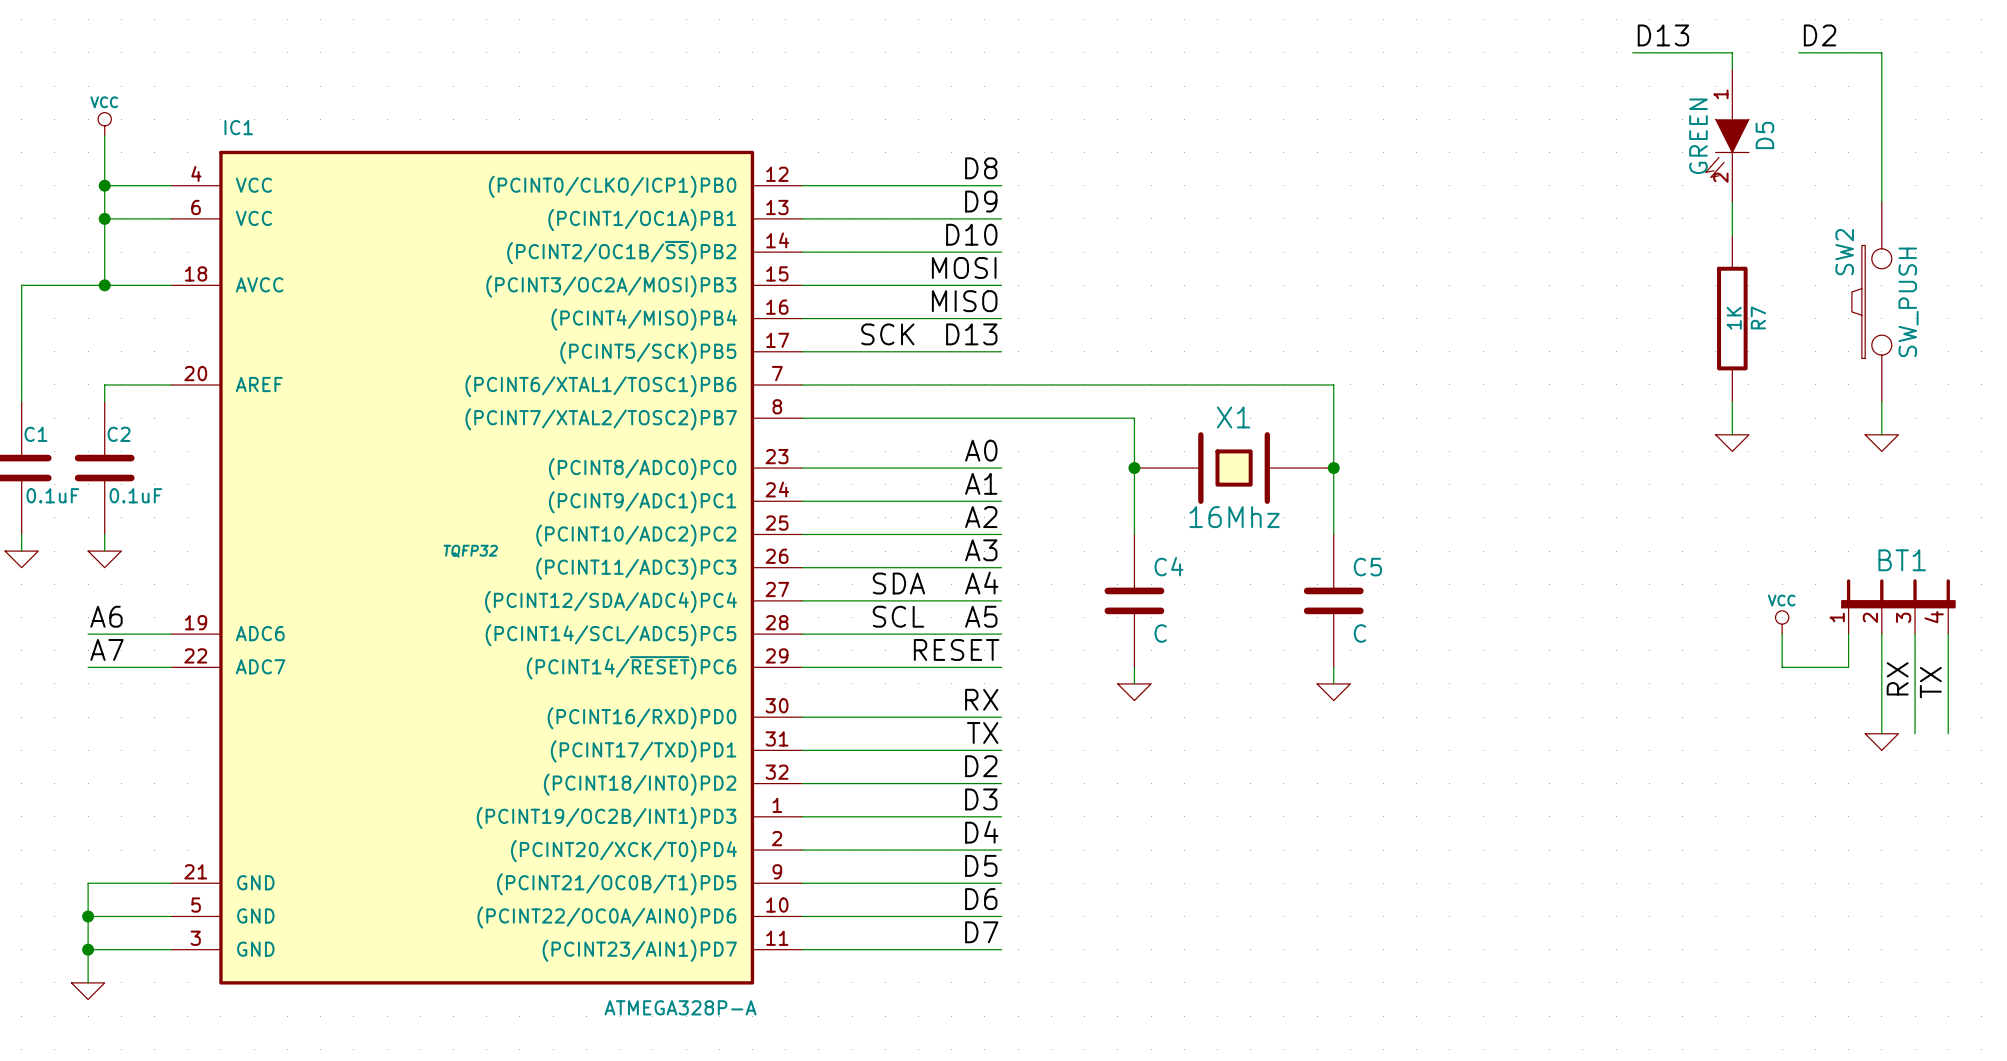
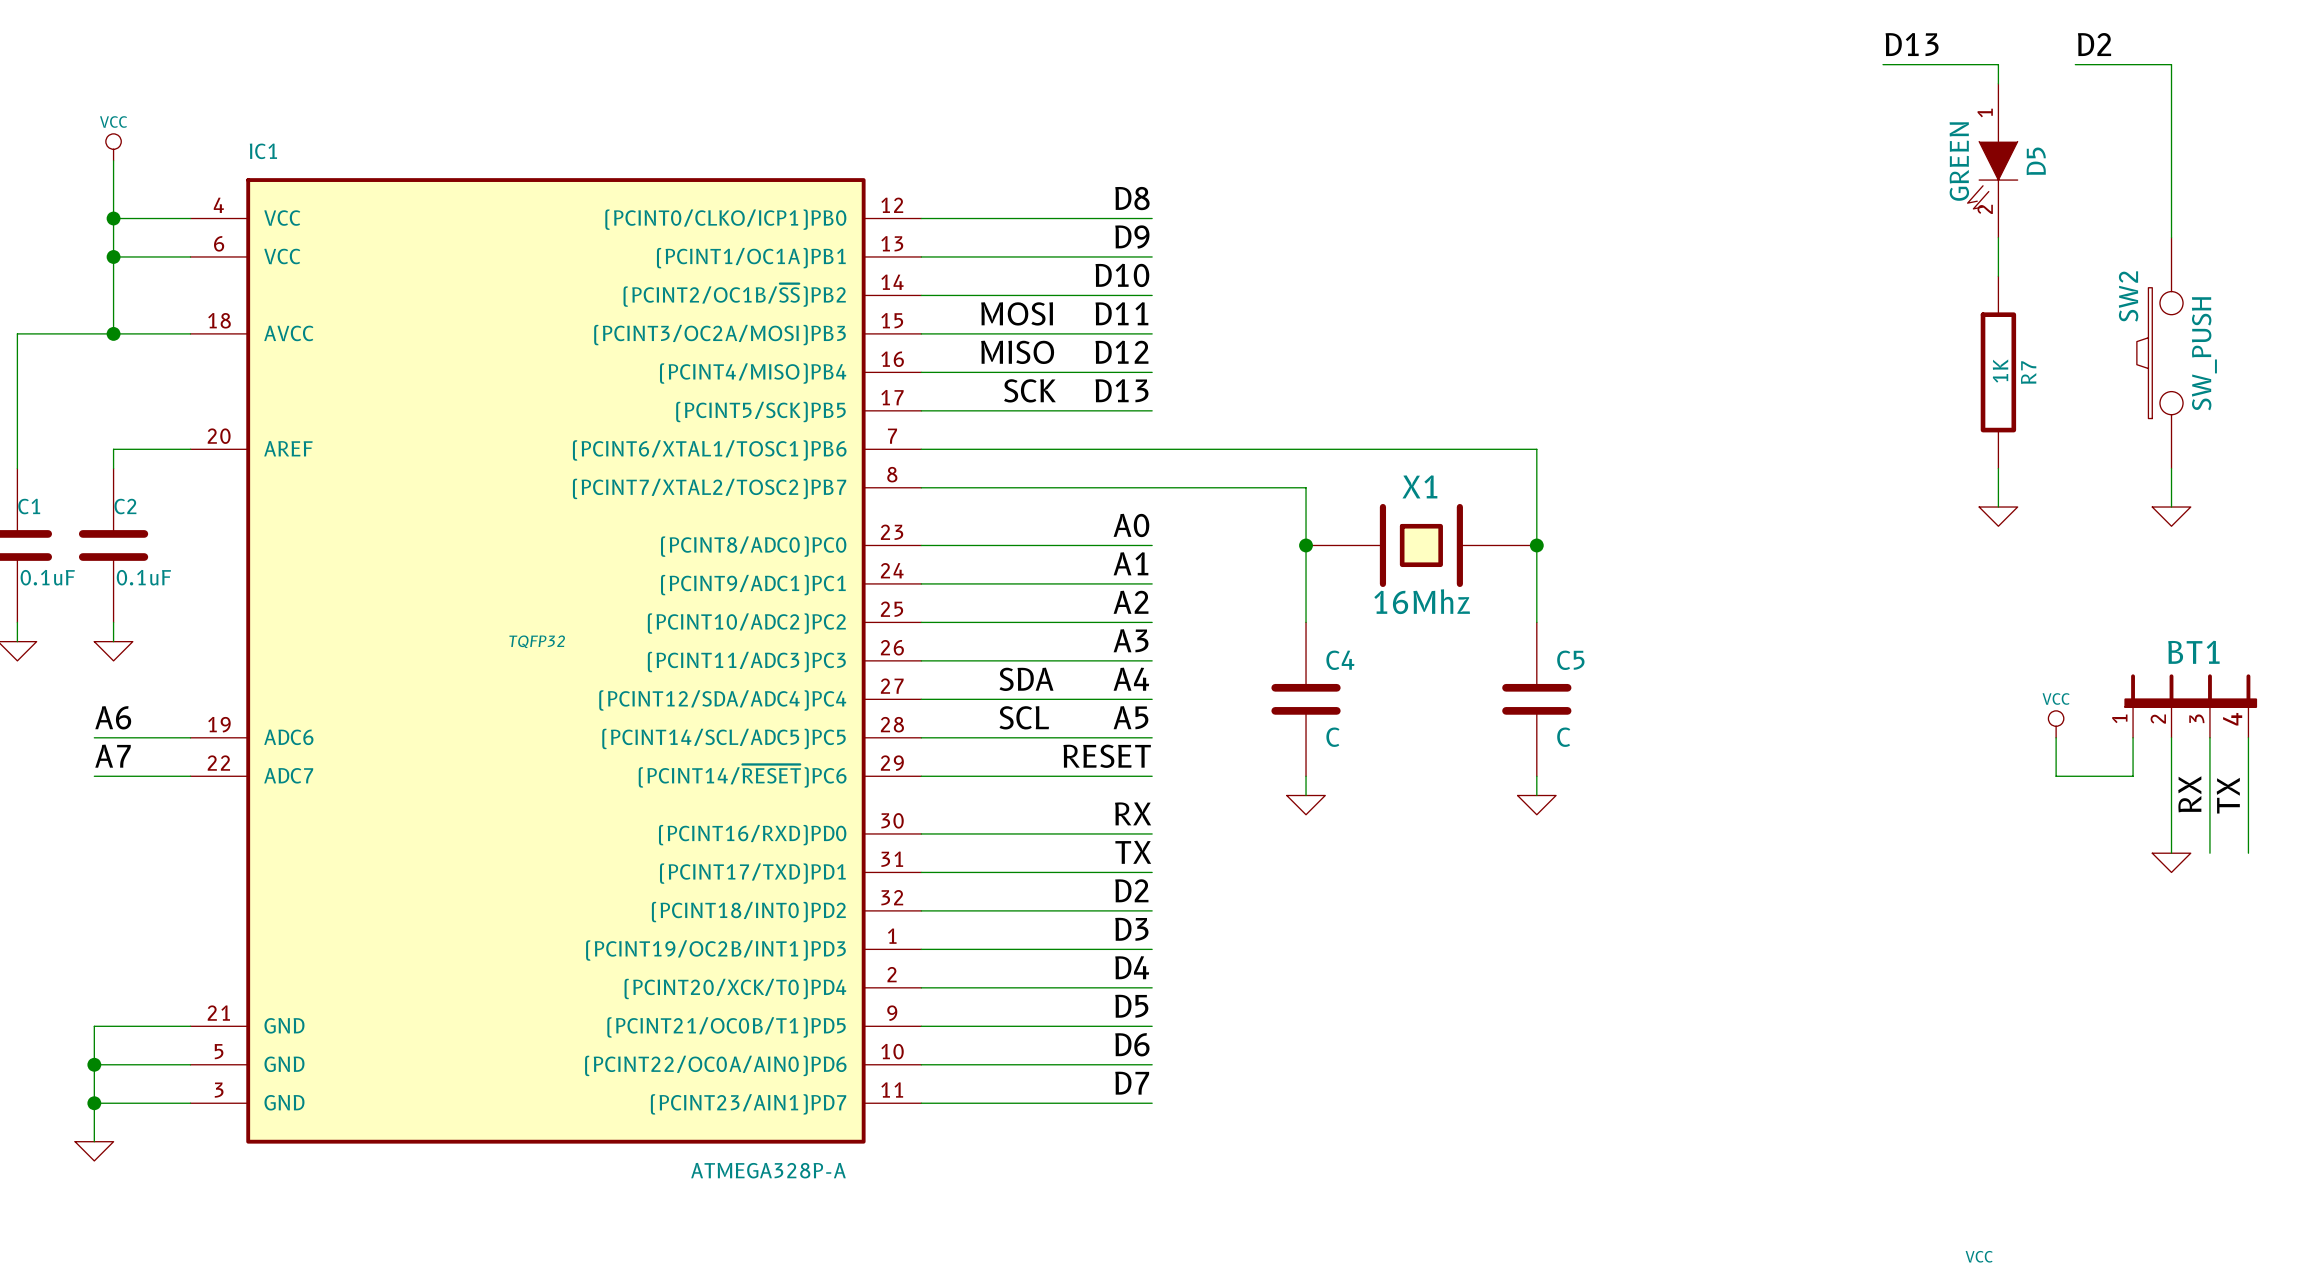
label: none -> MOSI (1017, 313)
label: MOSI (964, 267) -> D11 (1121, 313)
label: none -> MISO (1017, 352)
label: MISO (964, 301) -> D12 (1121, 352)

